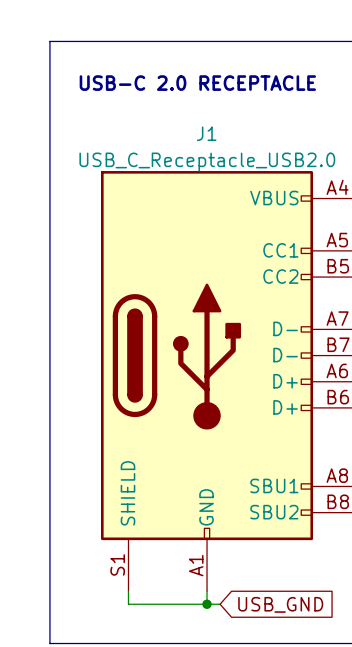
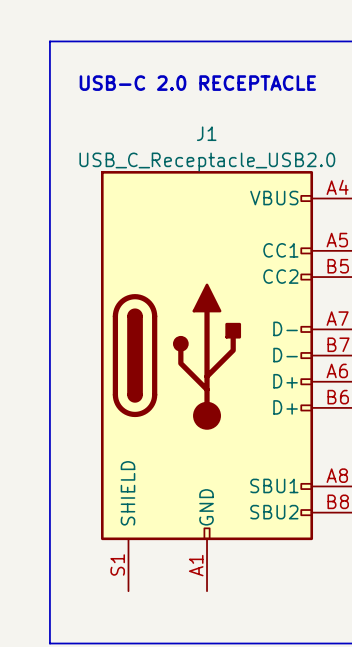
wire: (128, 591) (128, 604) (220, 604) -> none
wire: (207, 591) (207, 604) -> none
junction: (207, 604) -> none
global label: USB_GND (280, 604) -> none

